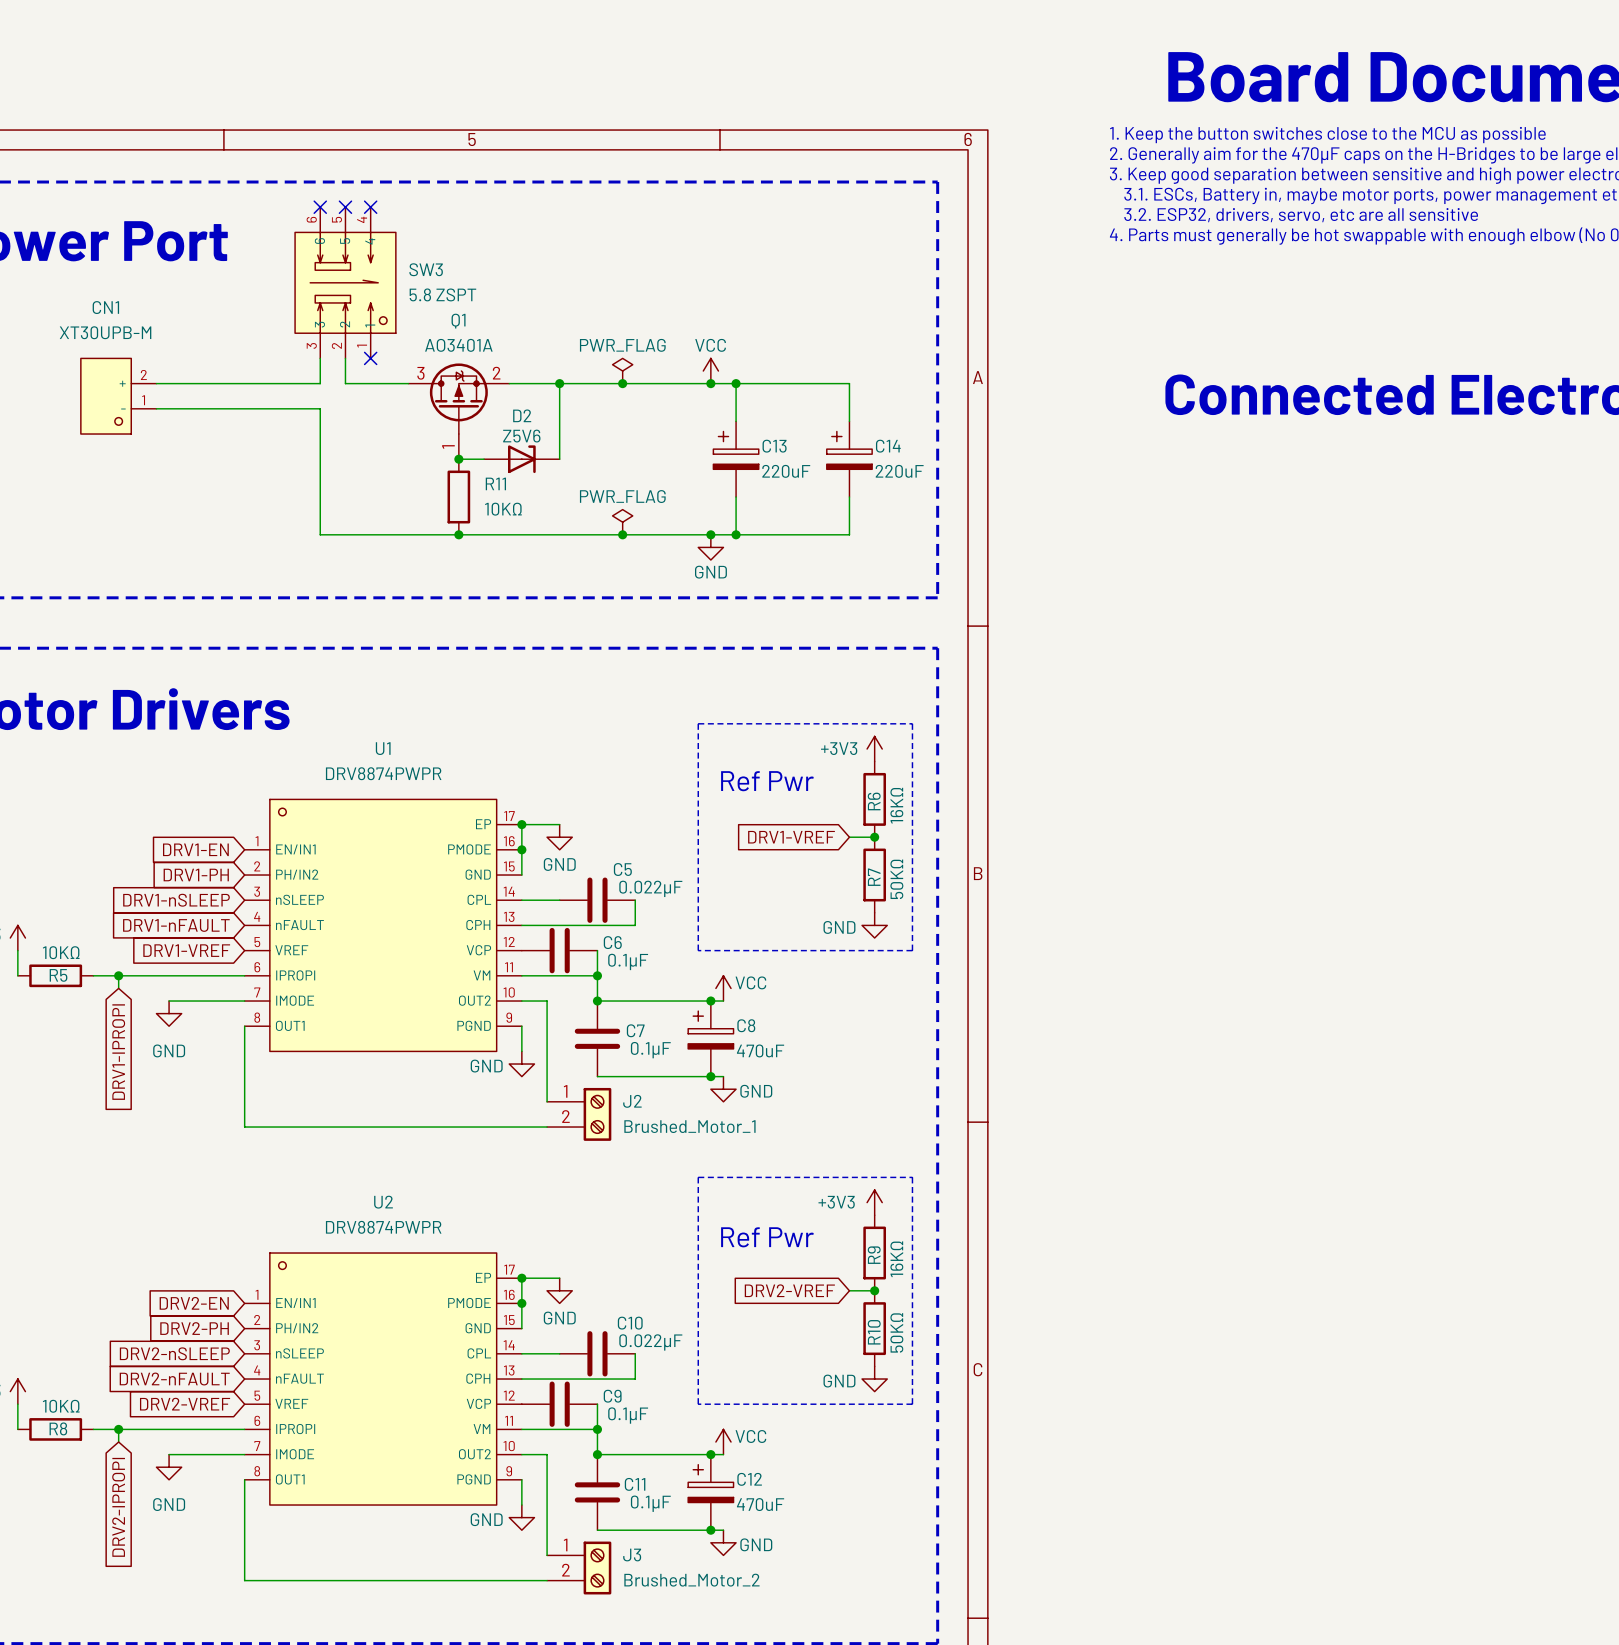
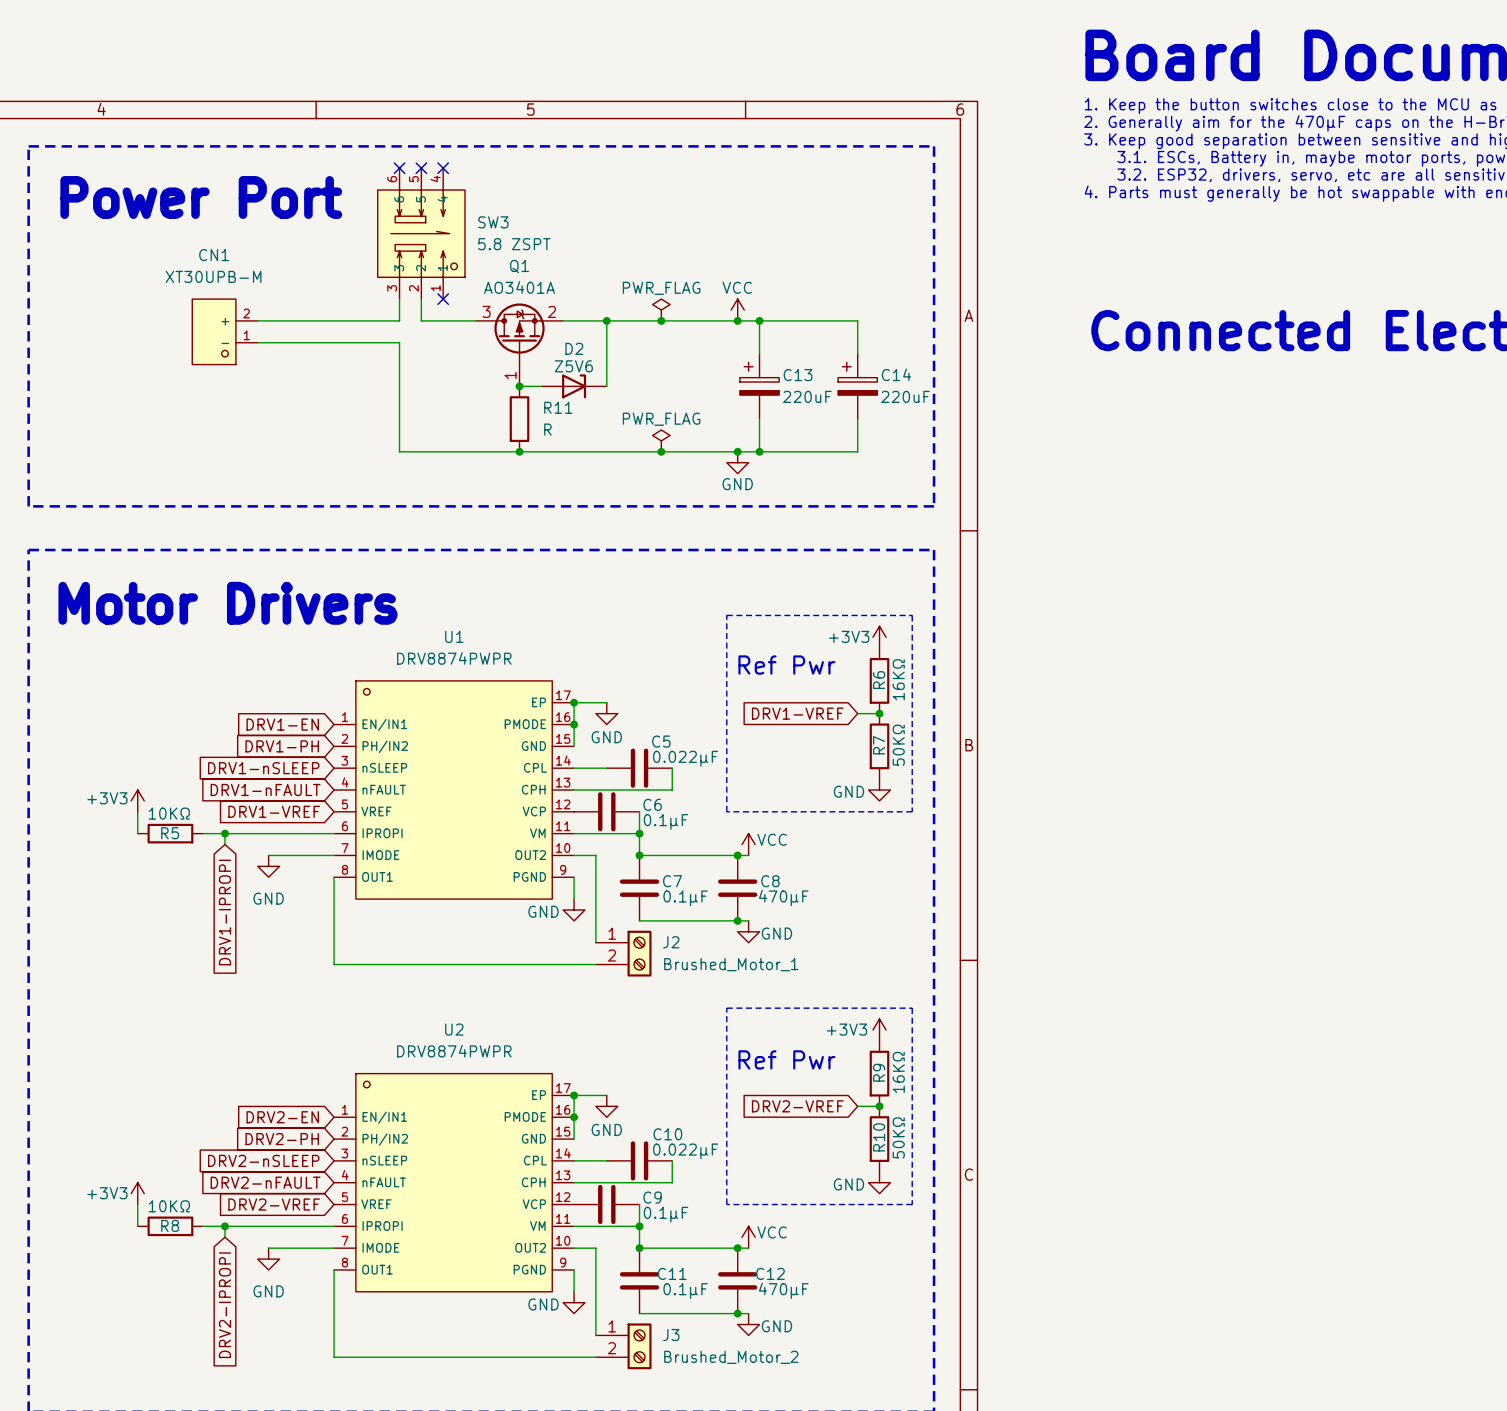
R11 value: 10KΩ (503, 509) -> R (547, 429)
C8 symbol: [688, 1001, 734, 1077] -> [718, 855, 758, 921]
C8 value: 470uF (760, 1050) -> 470µF (783, 898)
C12 symbol: [688, 1454, 734, 1531] -> [718, 1248, 758, 1314]
C12 value: 470uF (760, 1504) -> 470µF (783, 1290)

